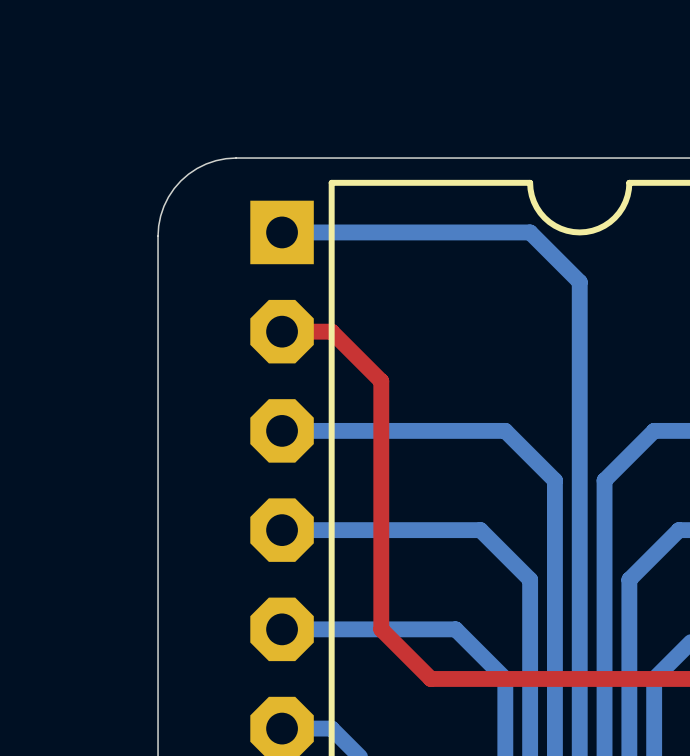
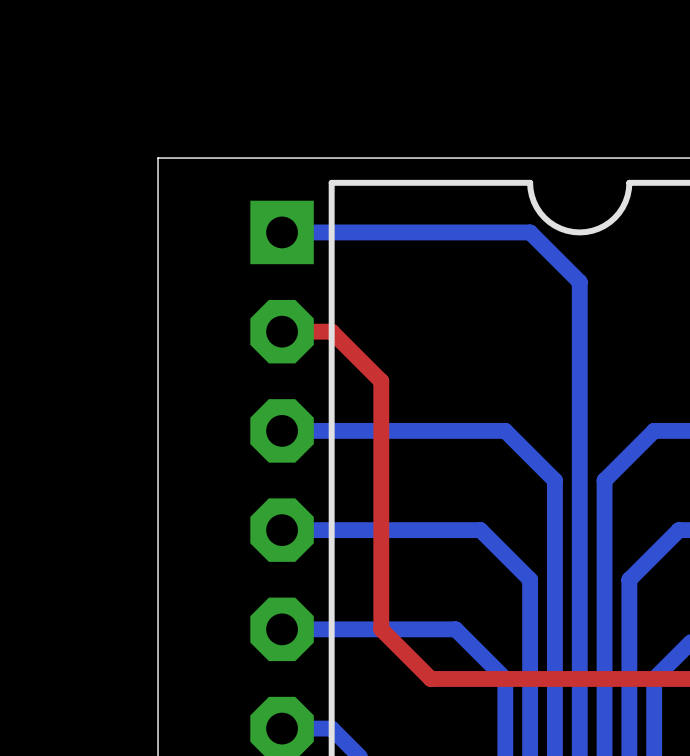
board edge: (236, 158) (206, 163) (180, 180) (163, 206) (158, 236) -> (236, 158) (158, 158) (158, 236)

